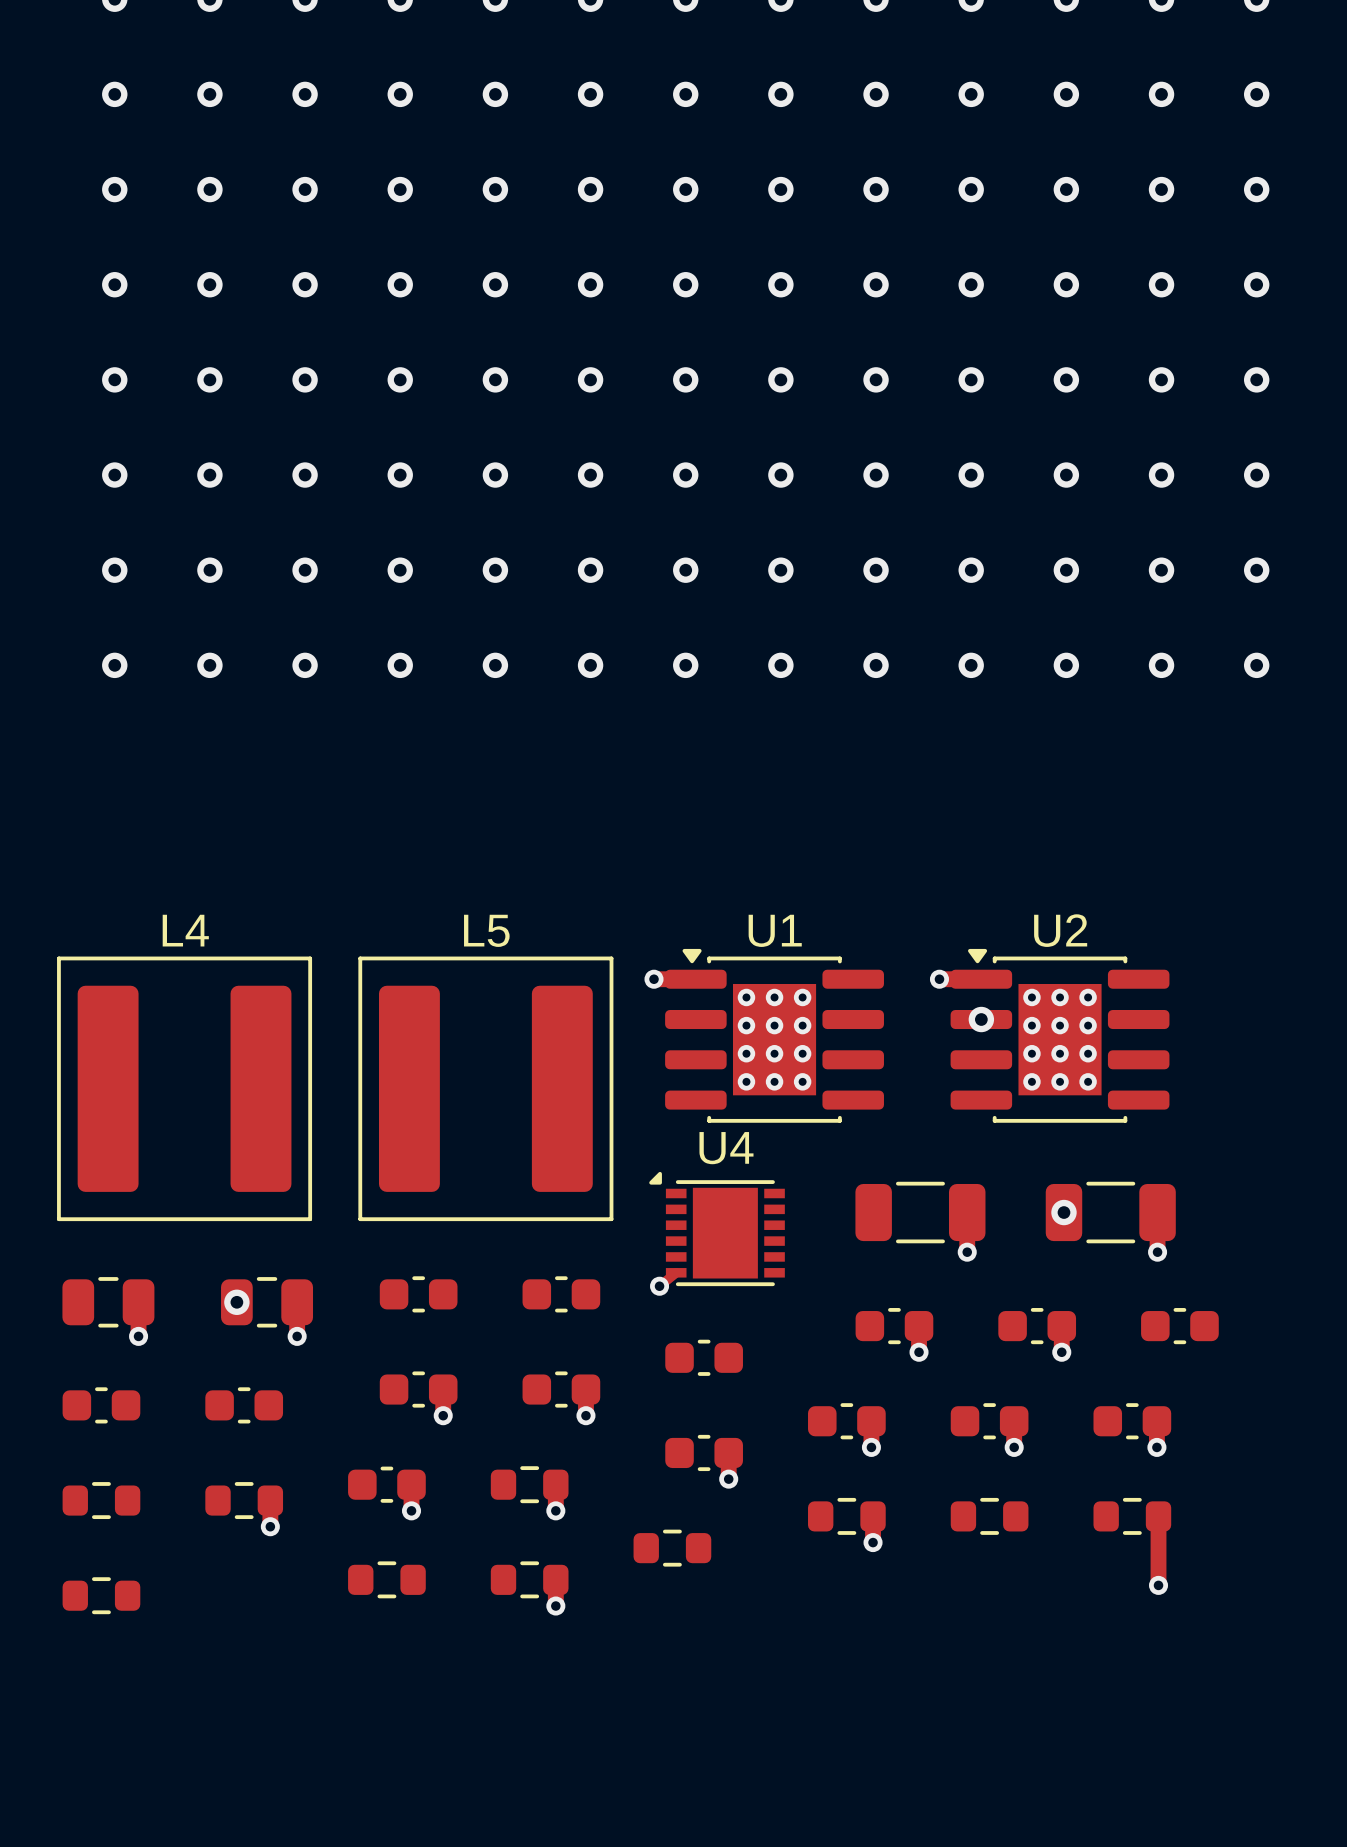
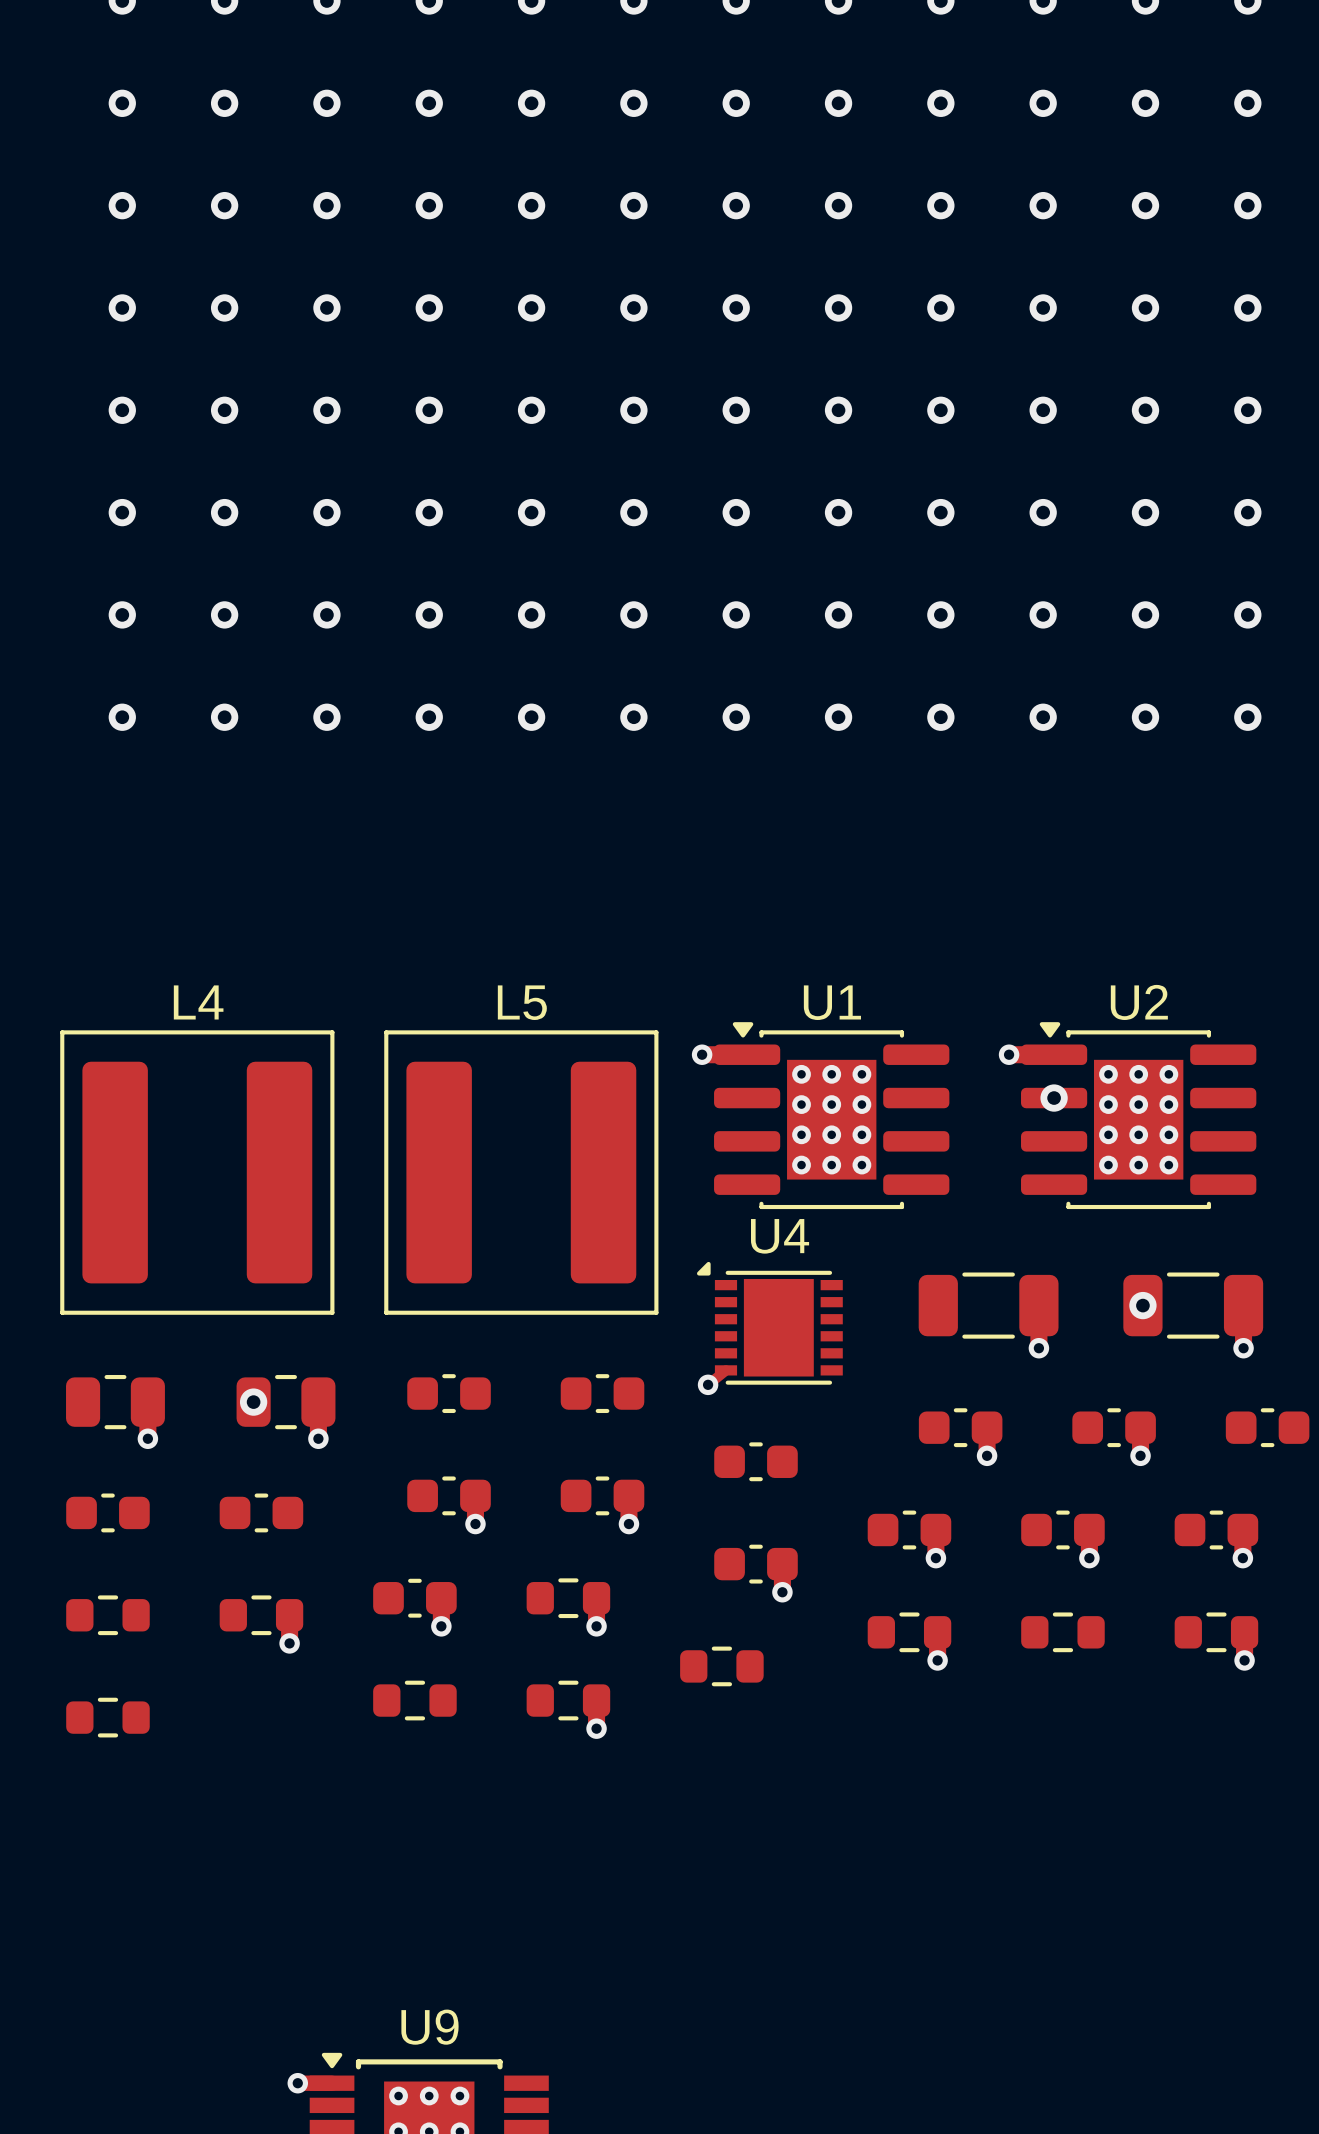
track: (1158, 1542) (1158, 1585) -> none
via position: (1158, 1585) -> (1244, 1660)

